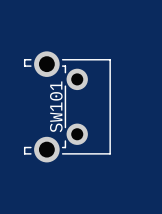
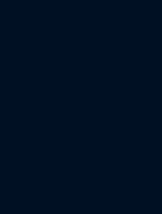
SW101: (67, 106) -> none

